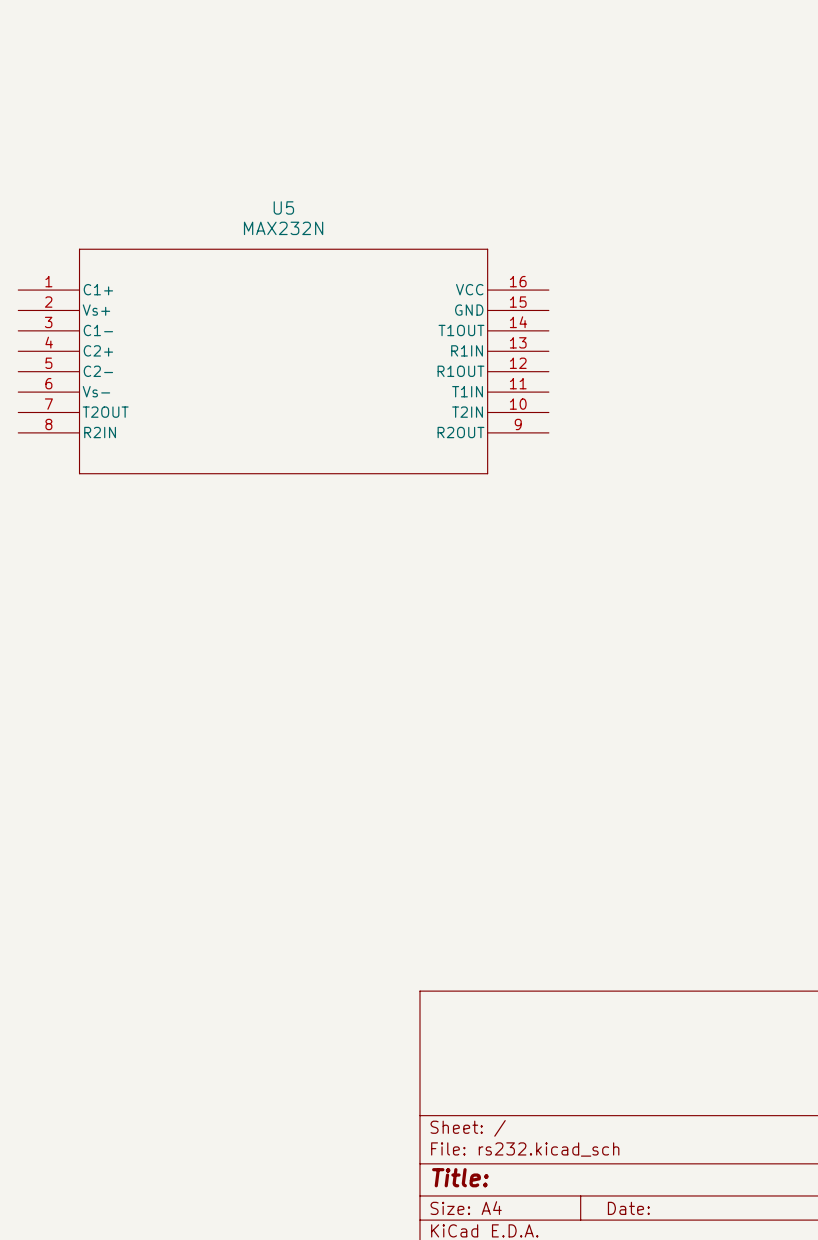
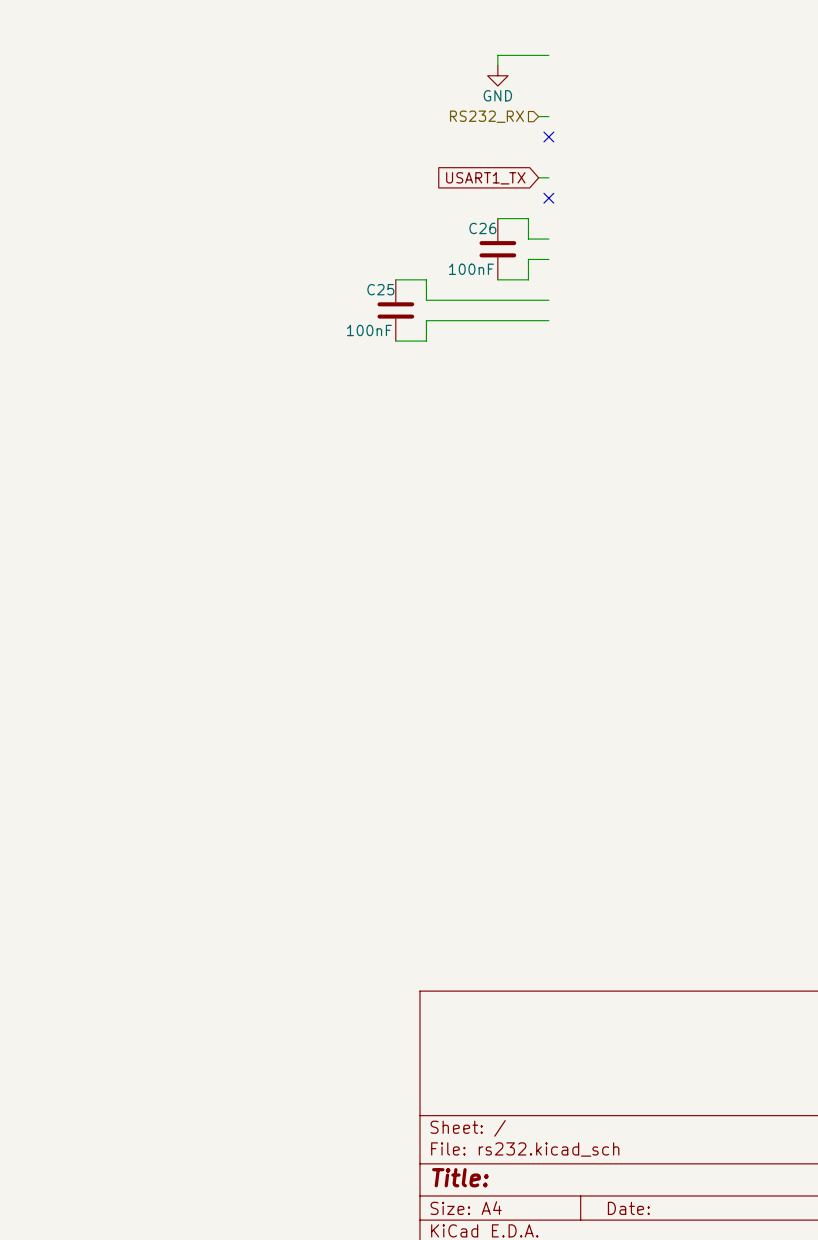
wire: none -> (548, 55) (497, 55) (497, 65)
power symbol: none -> GND (497, 75)
hierarchical label: none -> RS232_RX (487, 116)
wire: none -> (538, 116) (548, 116)
no-connect mark: none -> (548, 137)
wire: none -> (538, 177) (548, 177)
global label: none -> USART1_TX (485, 178)
no-connect mark: none -> (548, 198)
wire: none -> (497, 218) (528, 218) (528, 239) (548, 239)
C26: none -> 100nF (497, 249)
wire: none -> (548, 259) (528, 259) (528, 279) (497, 279)
wire: none -> (395, 279) (426, 279) (426, 300) (548, 300)
C25: none -> 100nF (395, 310)
wire: none -> (548, 320) (426, 320) (426, 341) (395, 341)
U5: MAX232N (283, 361) -> none

